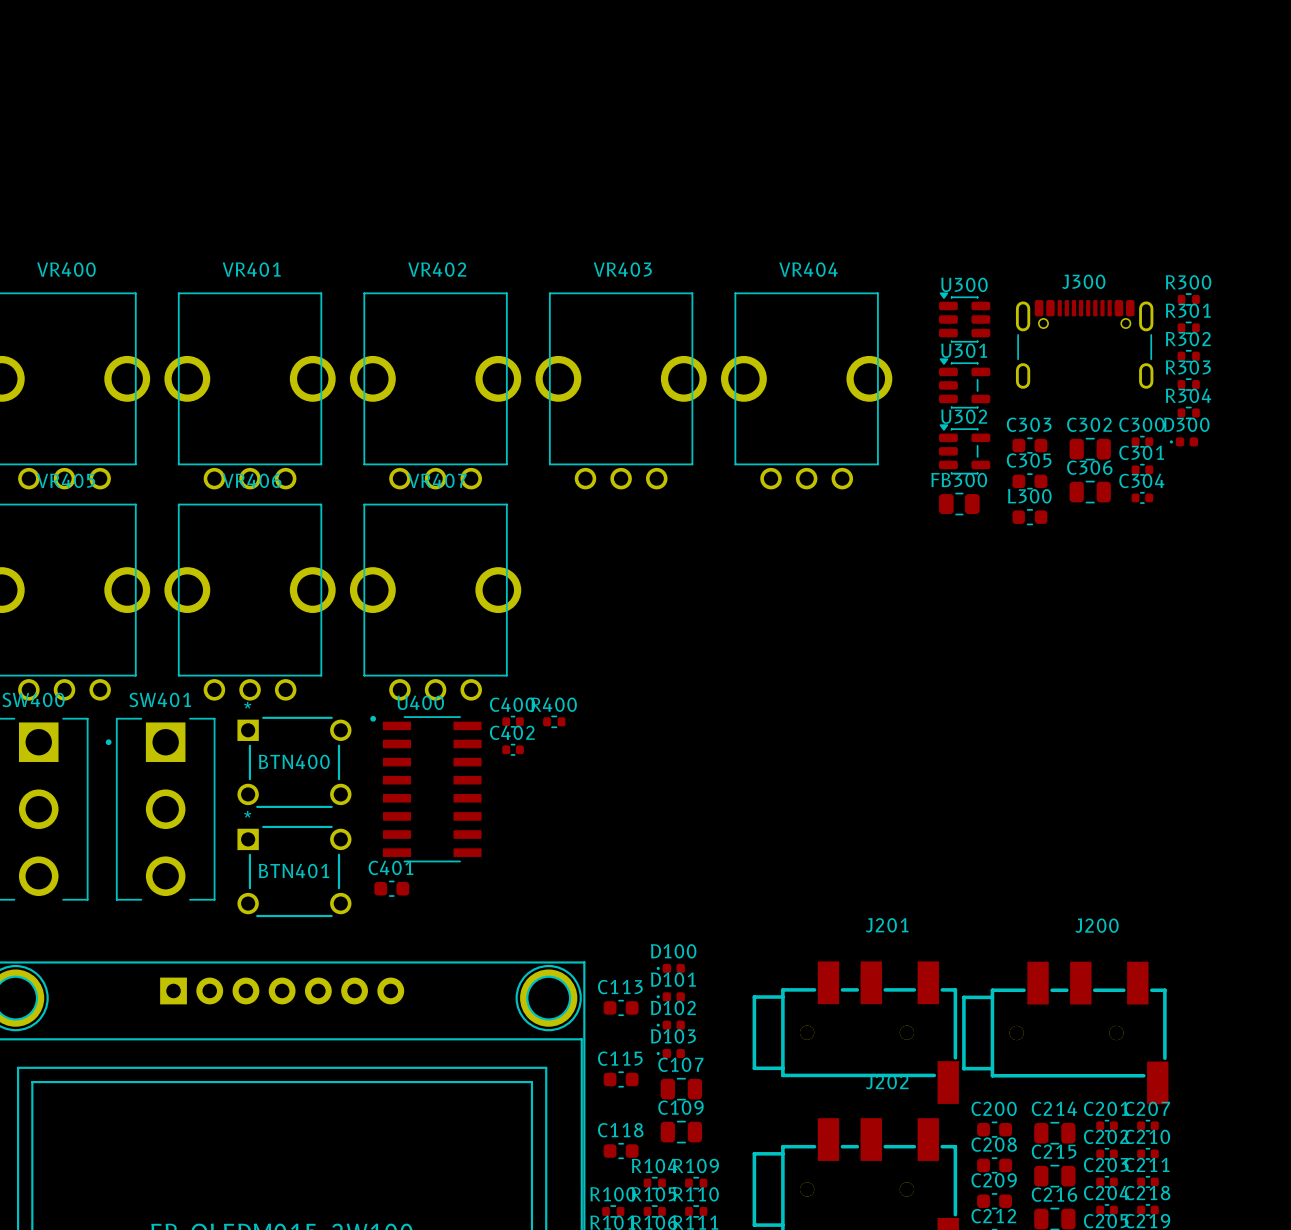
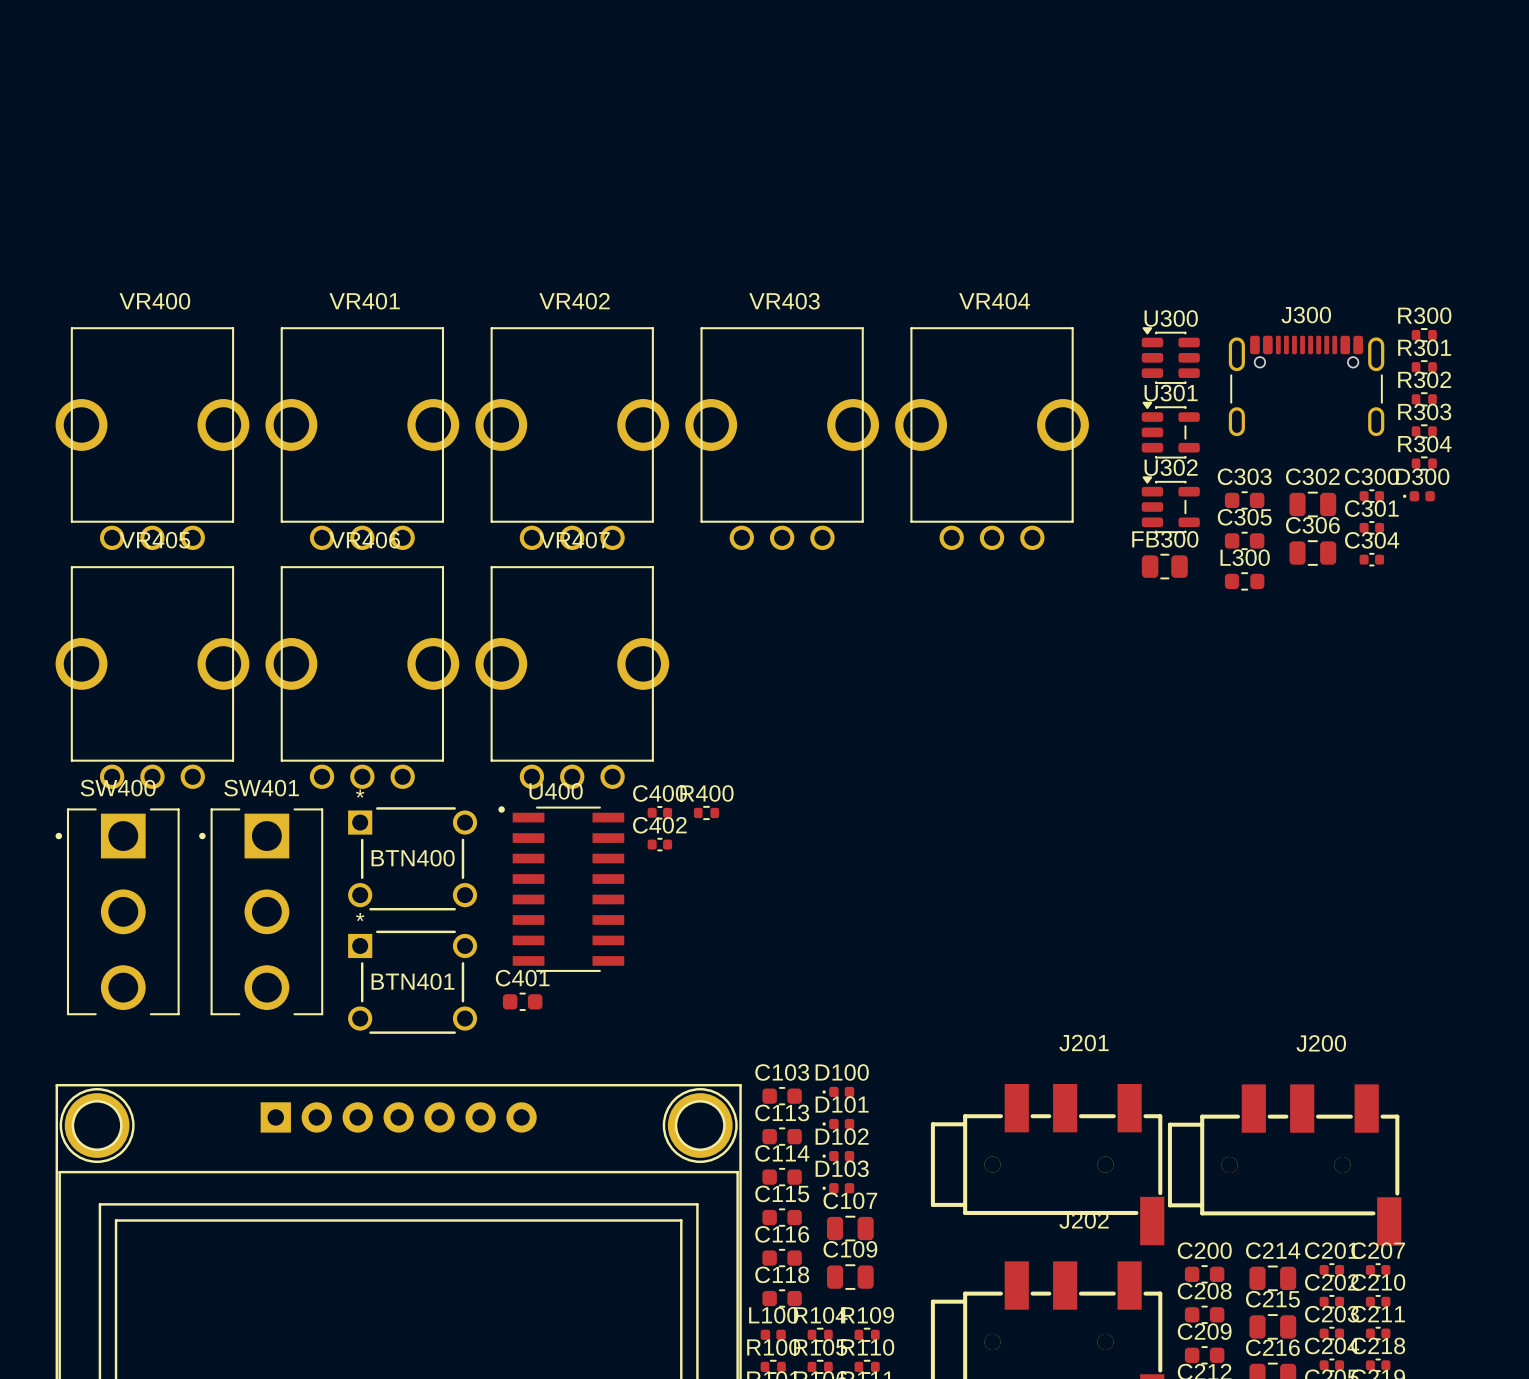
C103: none -> (782, 1096)
C114: none -> (782, 1177)
C116: none -> (782, 1258)
L100: none -> (773, 1334)

